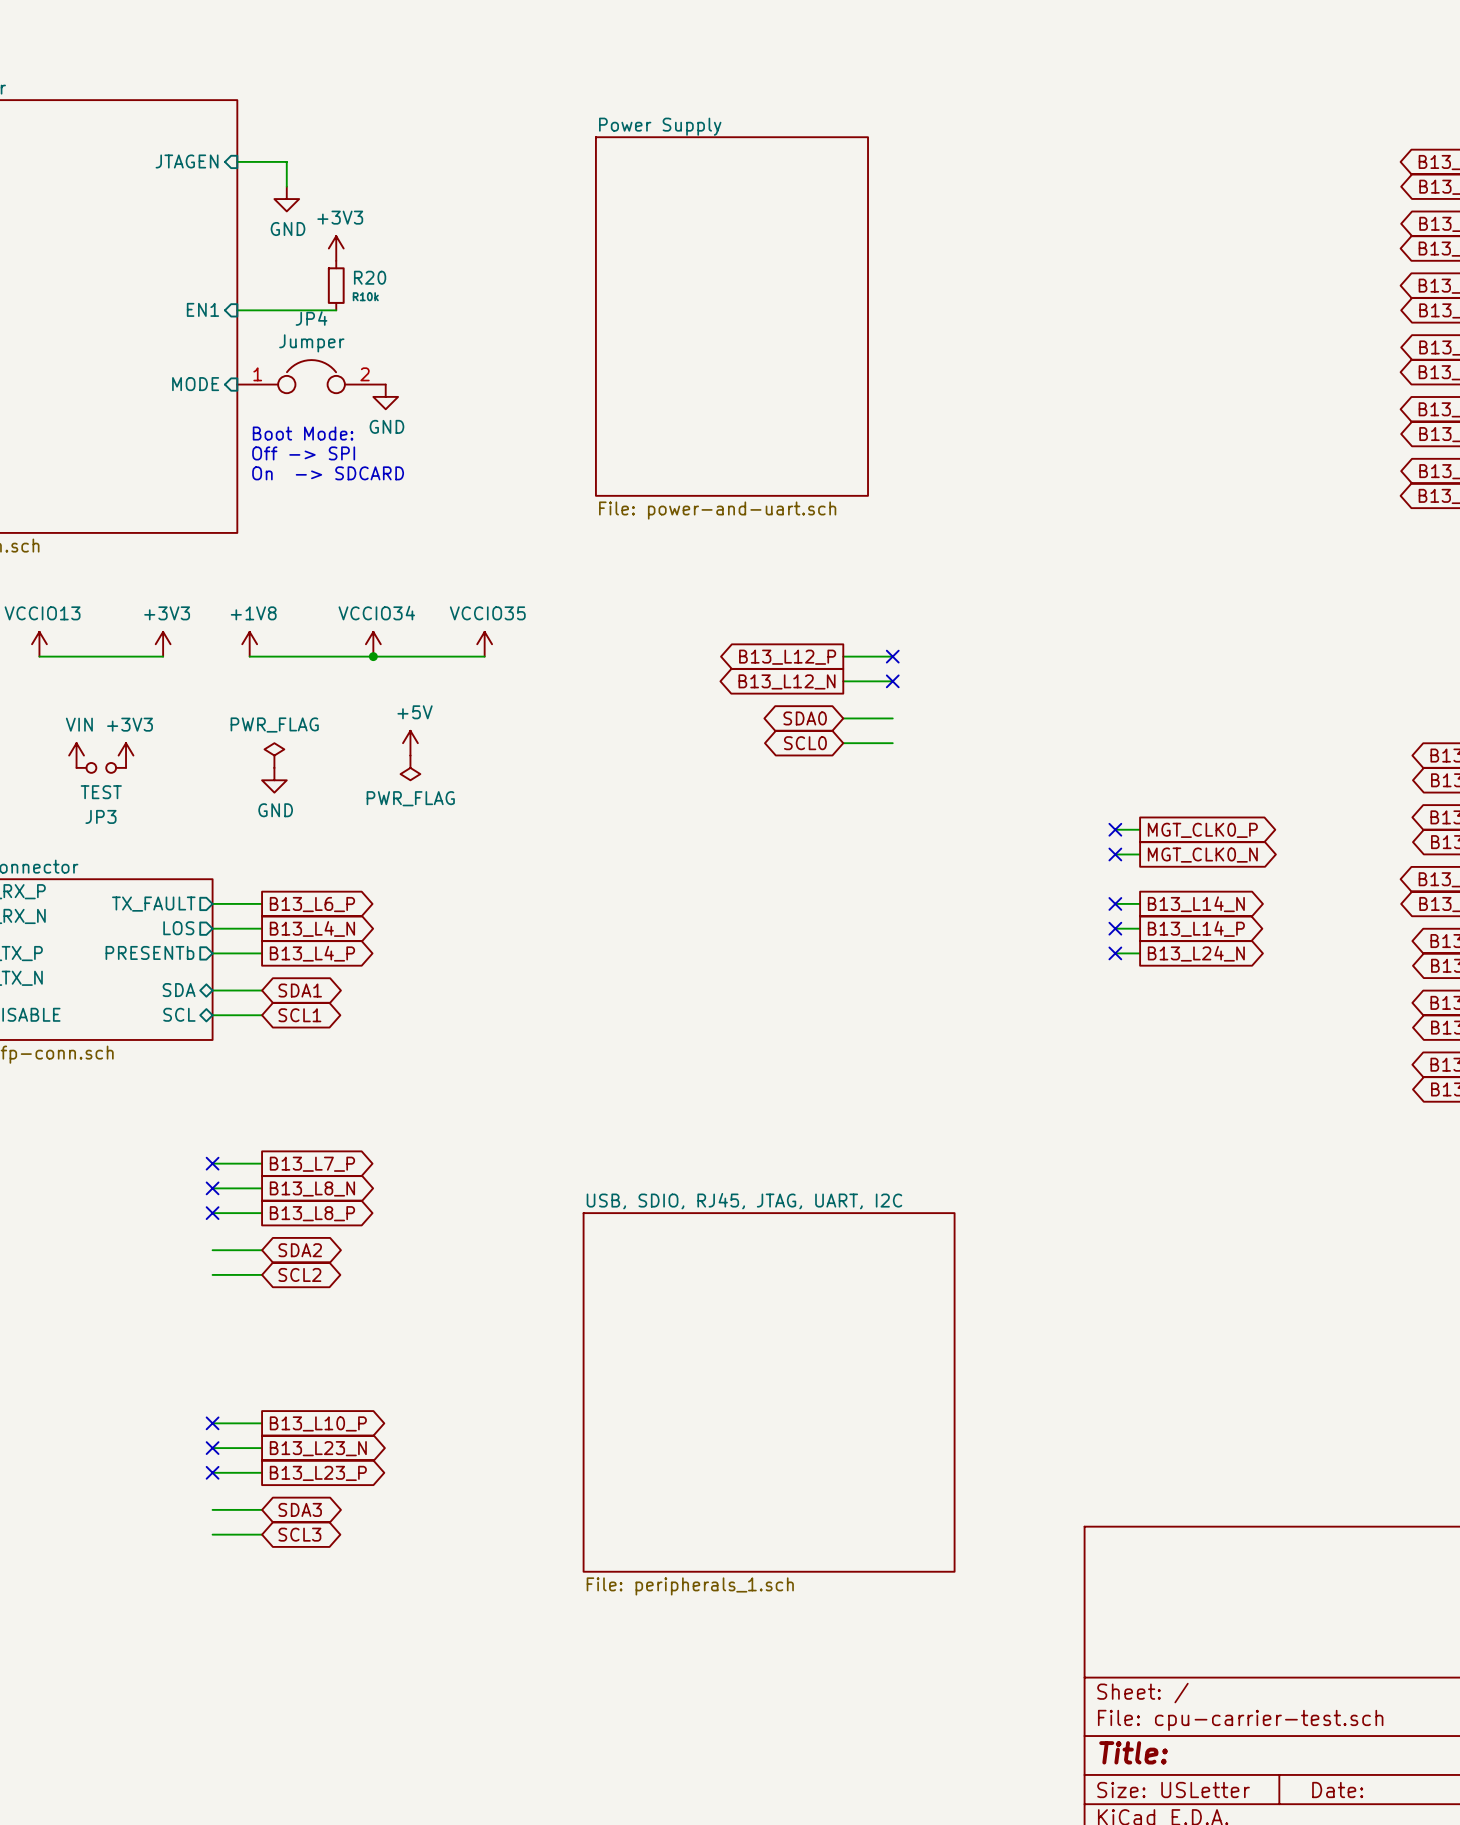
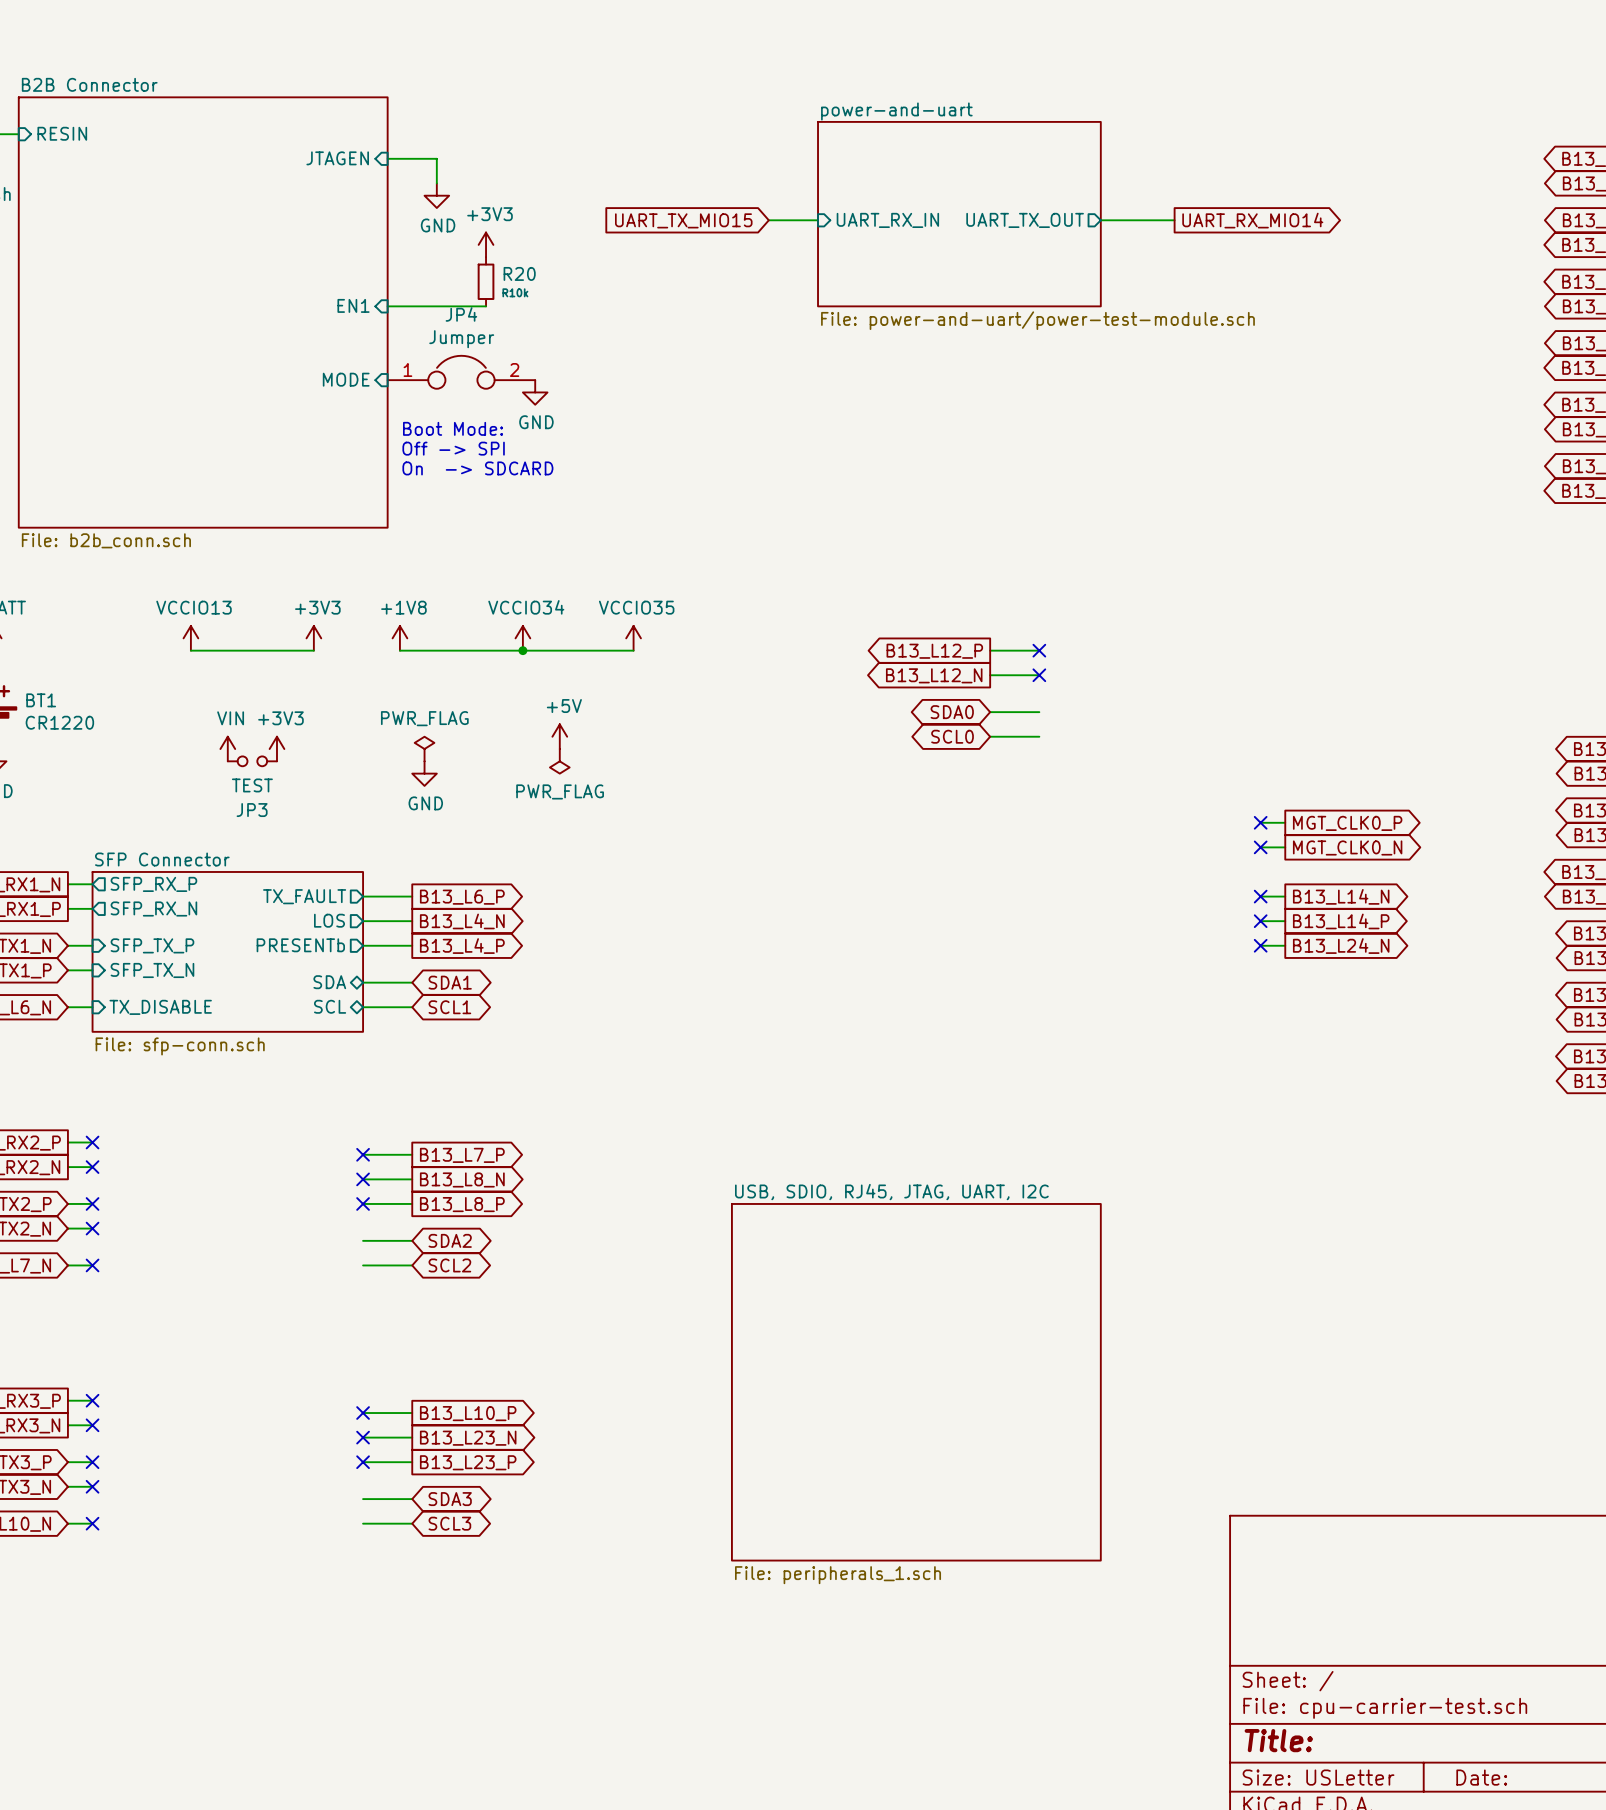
sheet power-and-uart: none -> File: power-and-uart/power-test-module.sch (959, 214)
wire: none -> (768, 220) (818, 220)
sheet pin: none -> UART_RX_IN (887, 220)
sheet pin: none -> UART_TX_OUT (1025, 220)
wire: none -> (1100, 220) (1174, 220)
global label: none -> UART_TX_MIO15 (683, 220)
global label: none -> UART_RX_MIO14 (1252, 220)
sheet Power Supply: File: power-and-uart.sch (731, 316) -> none

